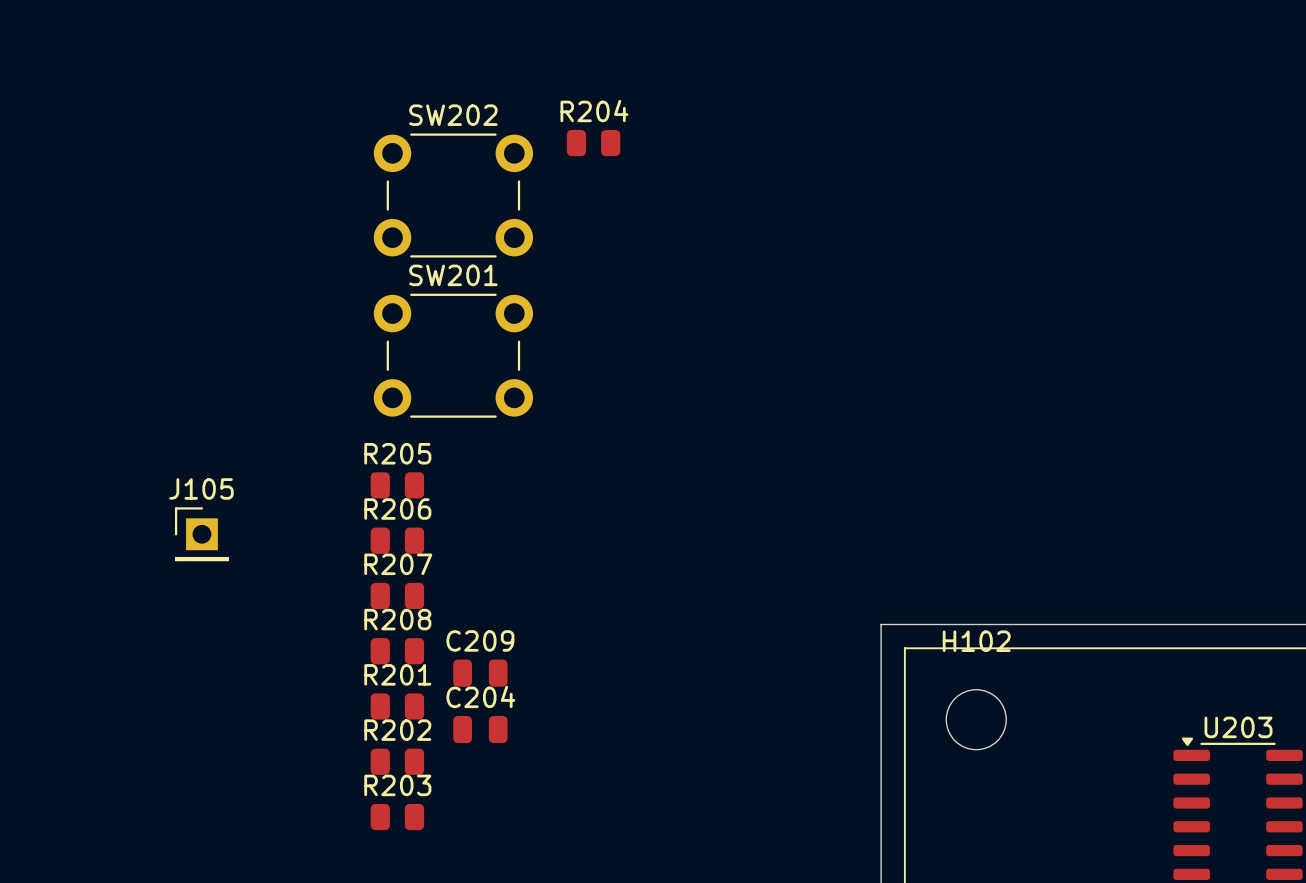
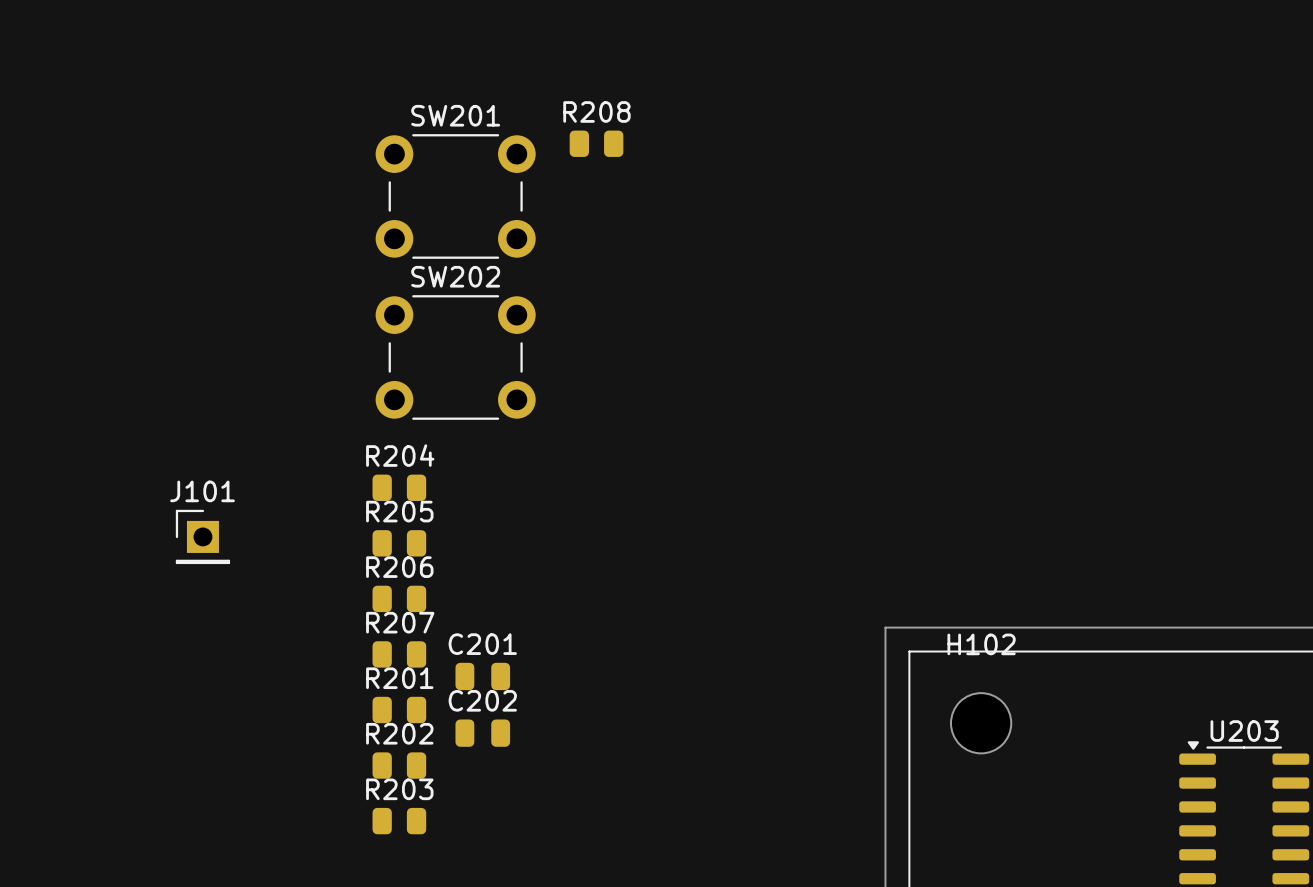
R204 name: R204 (594, 110) -> R208 (596, 111)
SW202 name: SW202 (453, 115) -> SW201 (455, 115)
SW201 name: SW201 (453, 275) -> SW202 (455, 276)
R205 name: R205 (397, 453) -> R204 (400, 455)
J105 name: J105 (201, 488) -> J101 (202, 491)
R206 name: R206 (397, 509) -> R205 (399, 511)
R207 name: R207 (398, 564) -> R206 (399, 567)
R208 name: R208 (397, 619) -> R207 (400, 622)
C209 name: C209 (480, 640) -> C201 (482, 644)
C204 name: C204 (480, 696) -> C202 (482, 700)

